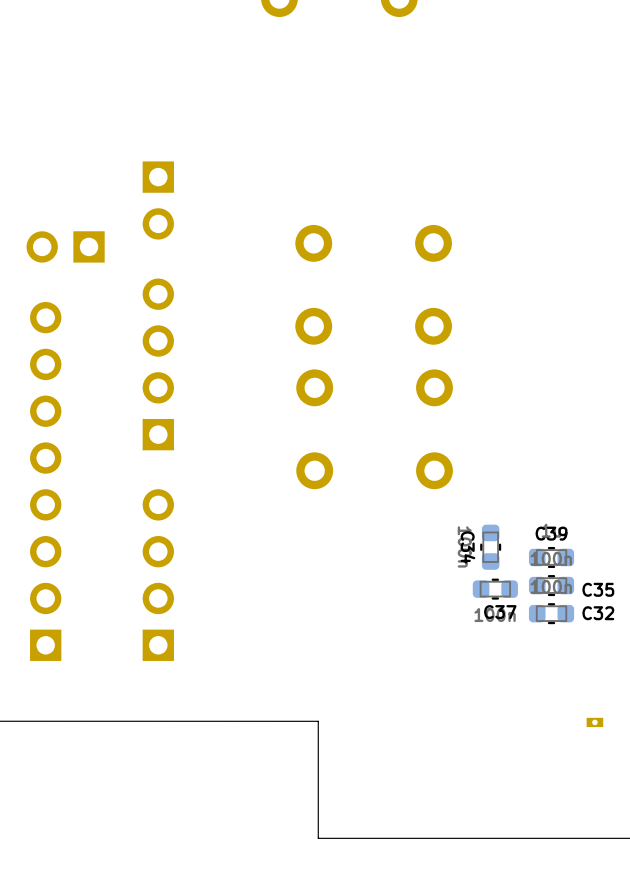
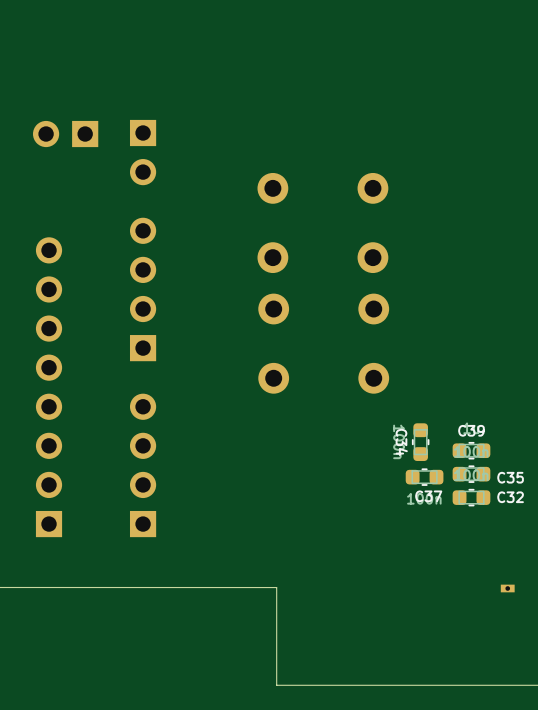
part position: (65, 246) -> (65, 134)

